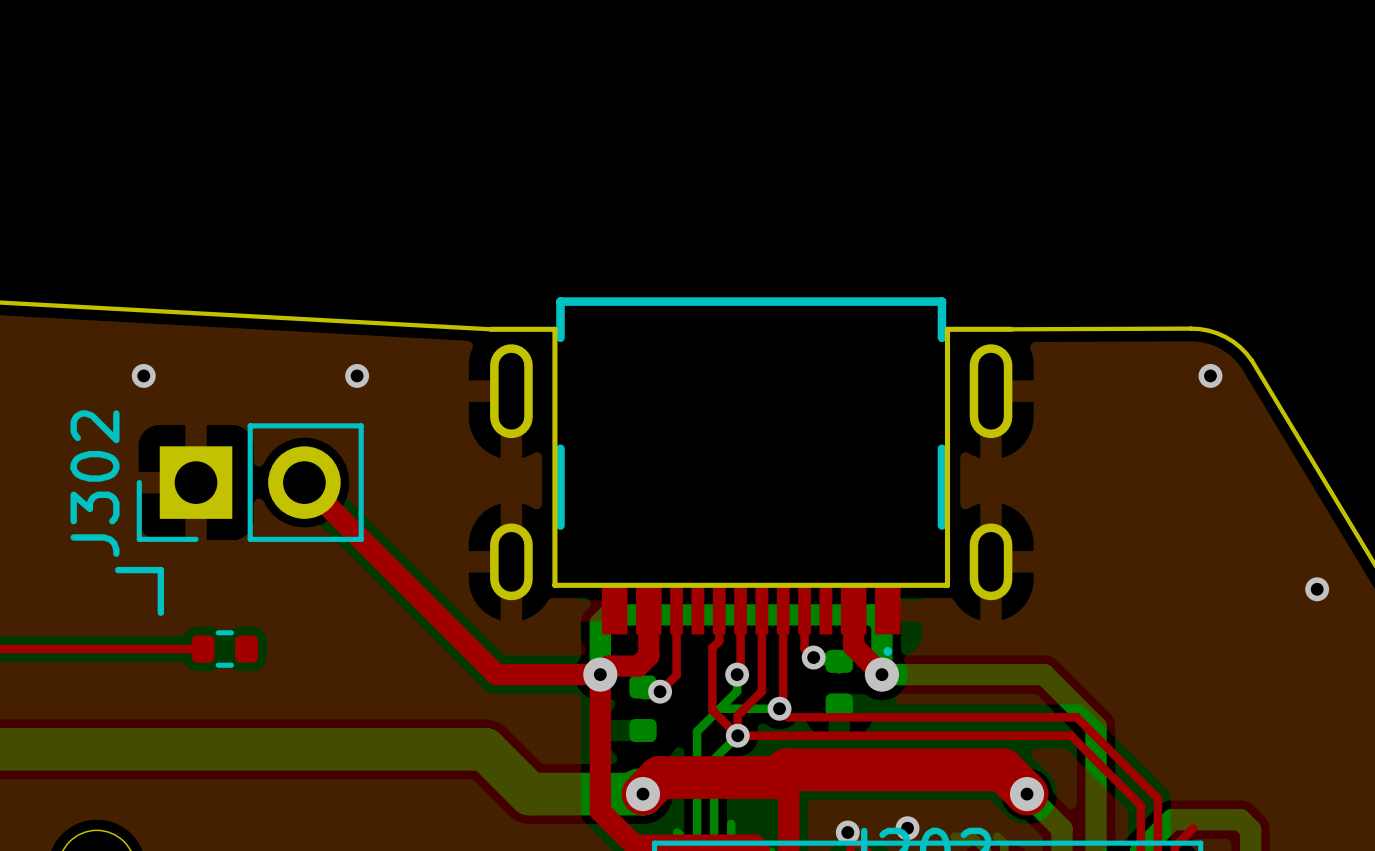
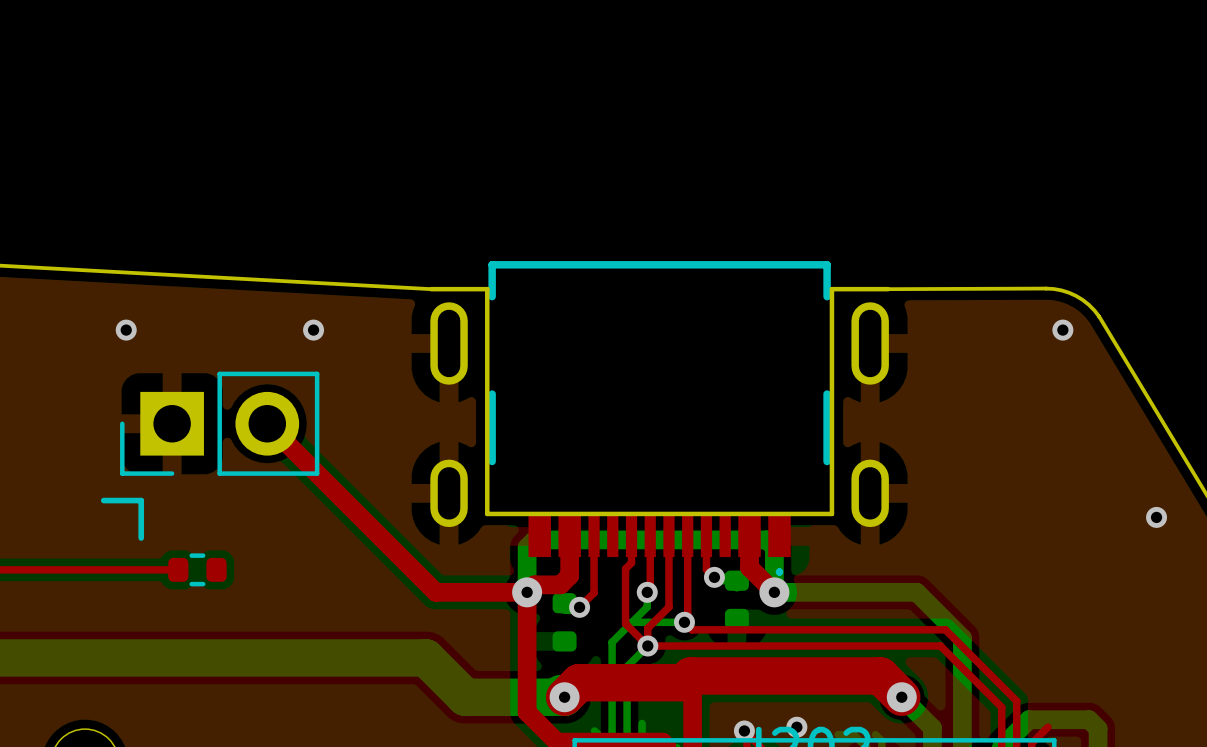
J302 name: J302 (95, 483) -> none

